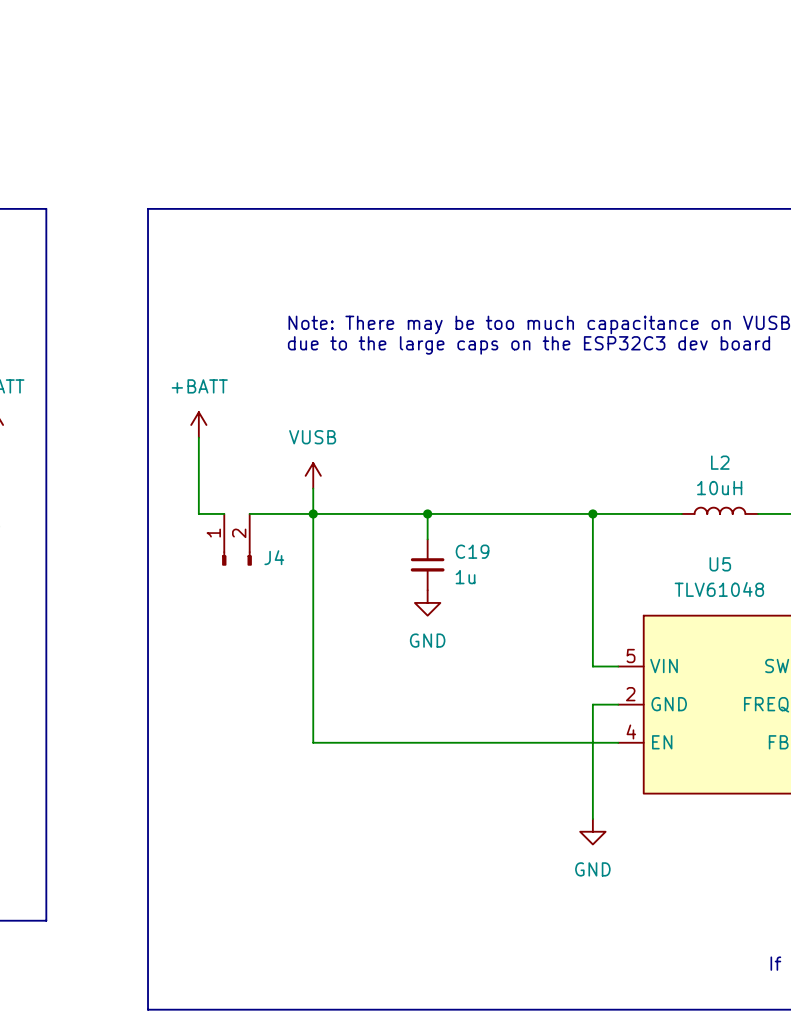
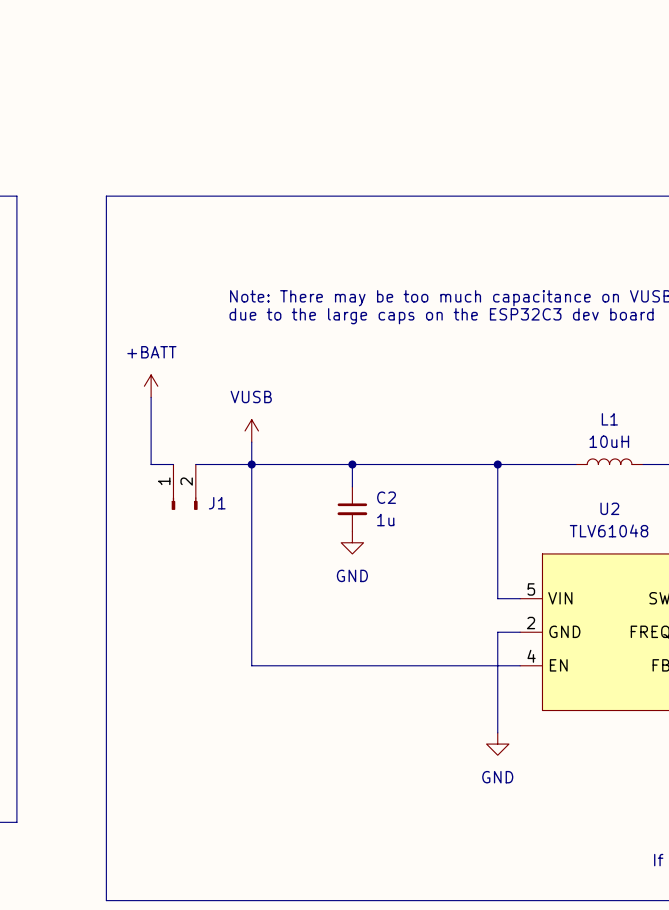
L2 name: L2 (720, 462) -> L1 (609, 419)
C19 name: C19 (472, 551) -> C2 (386, 497)
J4 name: J4 (274, 557) -> J1 (217, 503)
U5 name: U5 (720, 564) -> U2 (609, 508)

